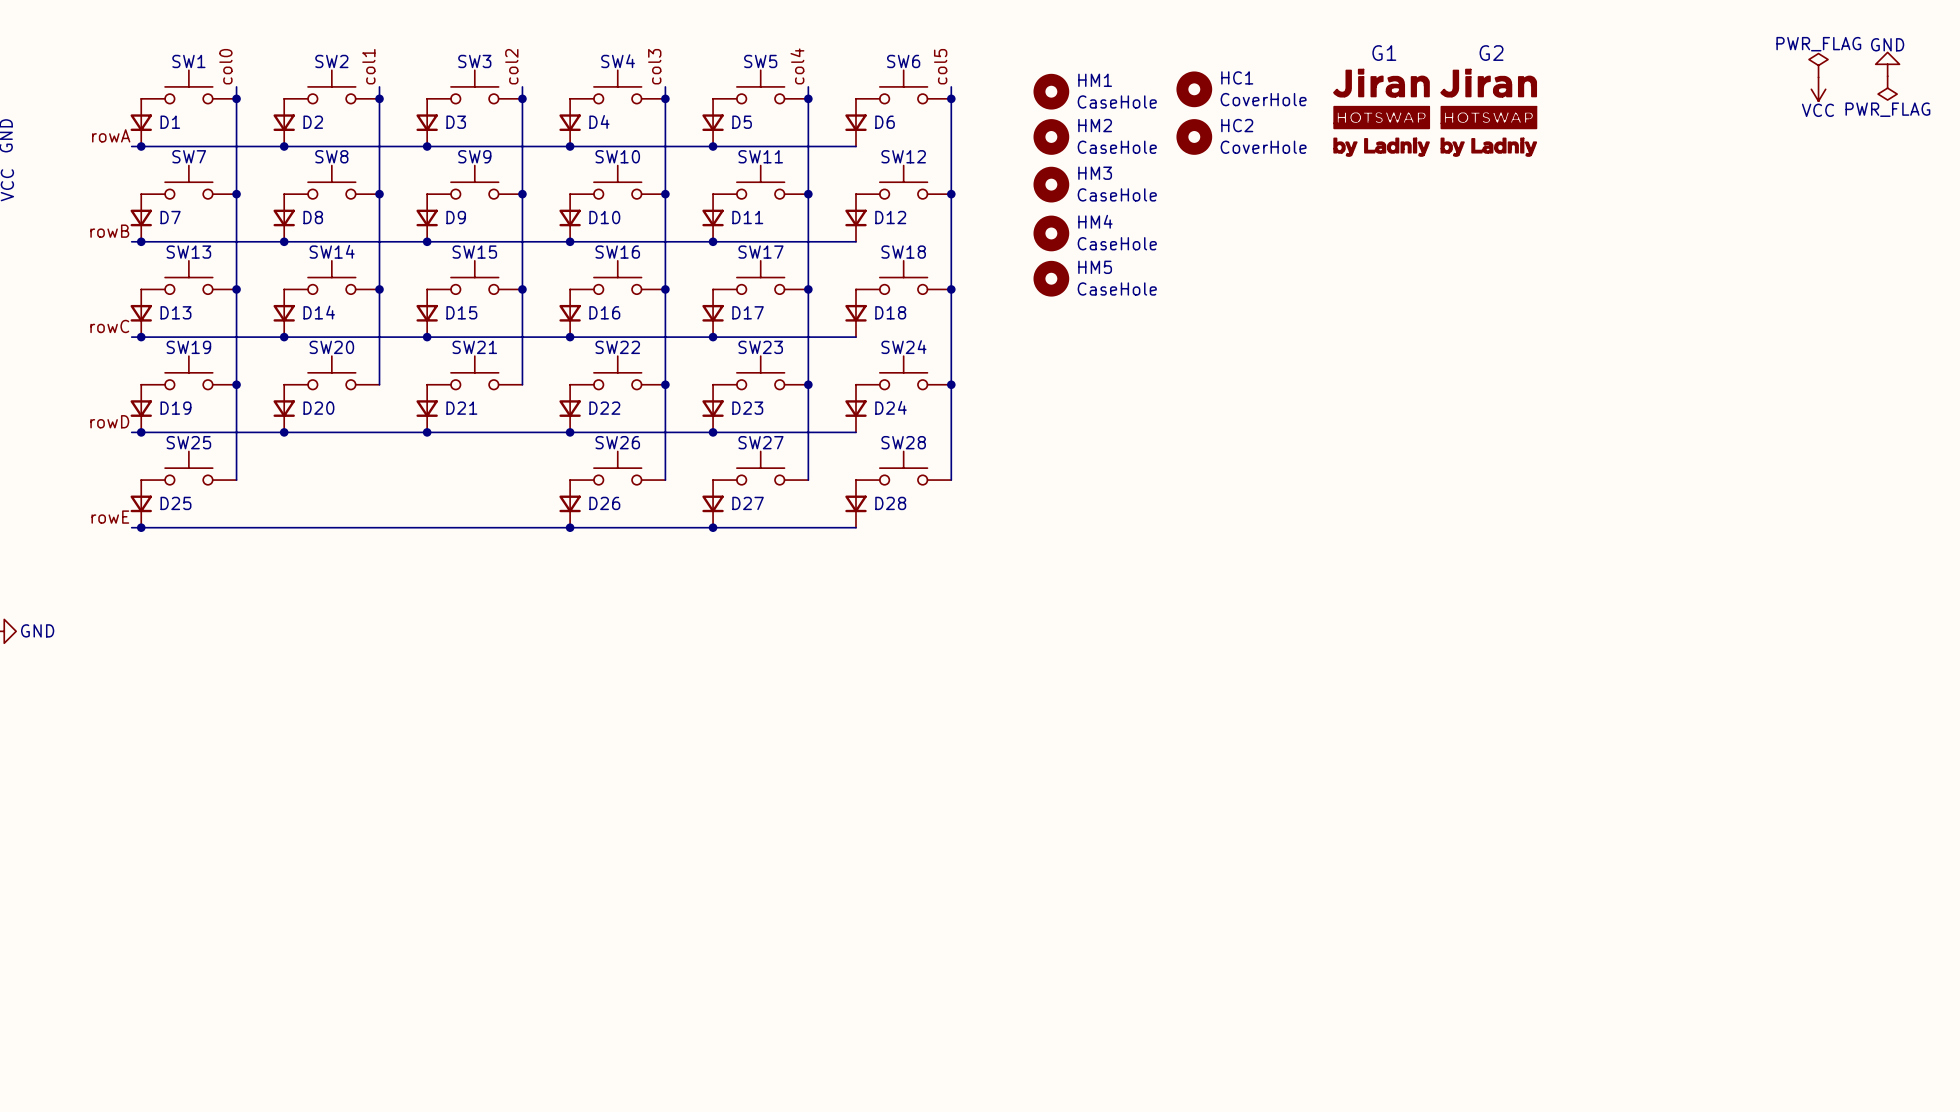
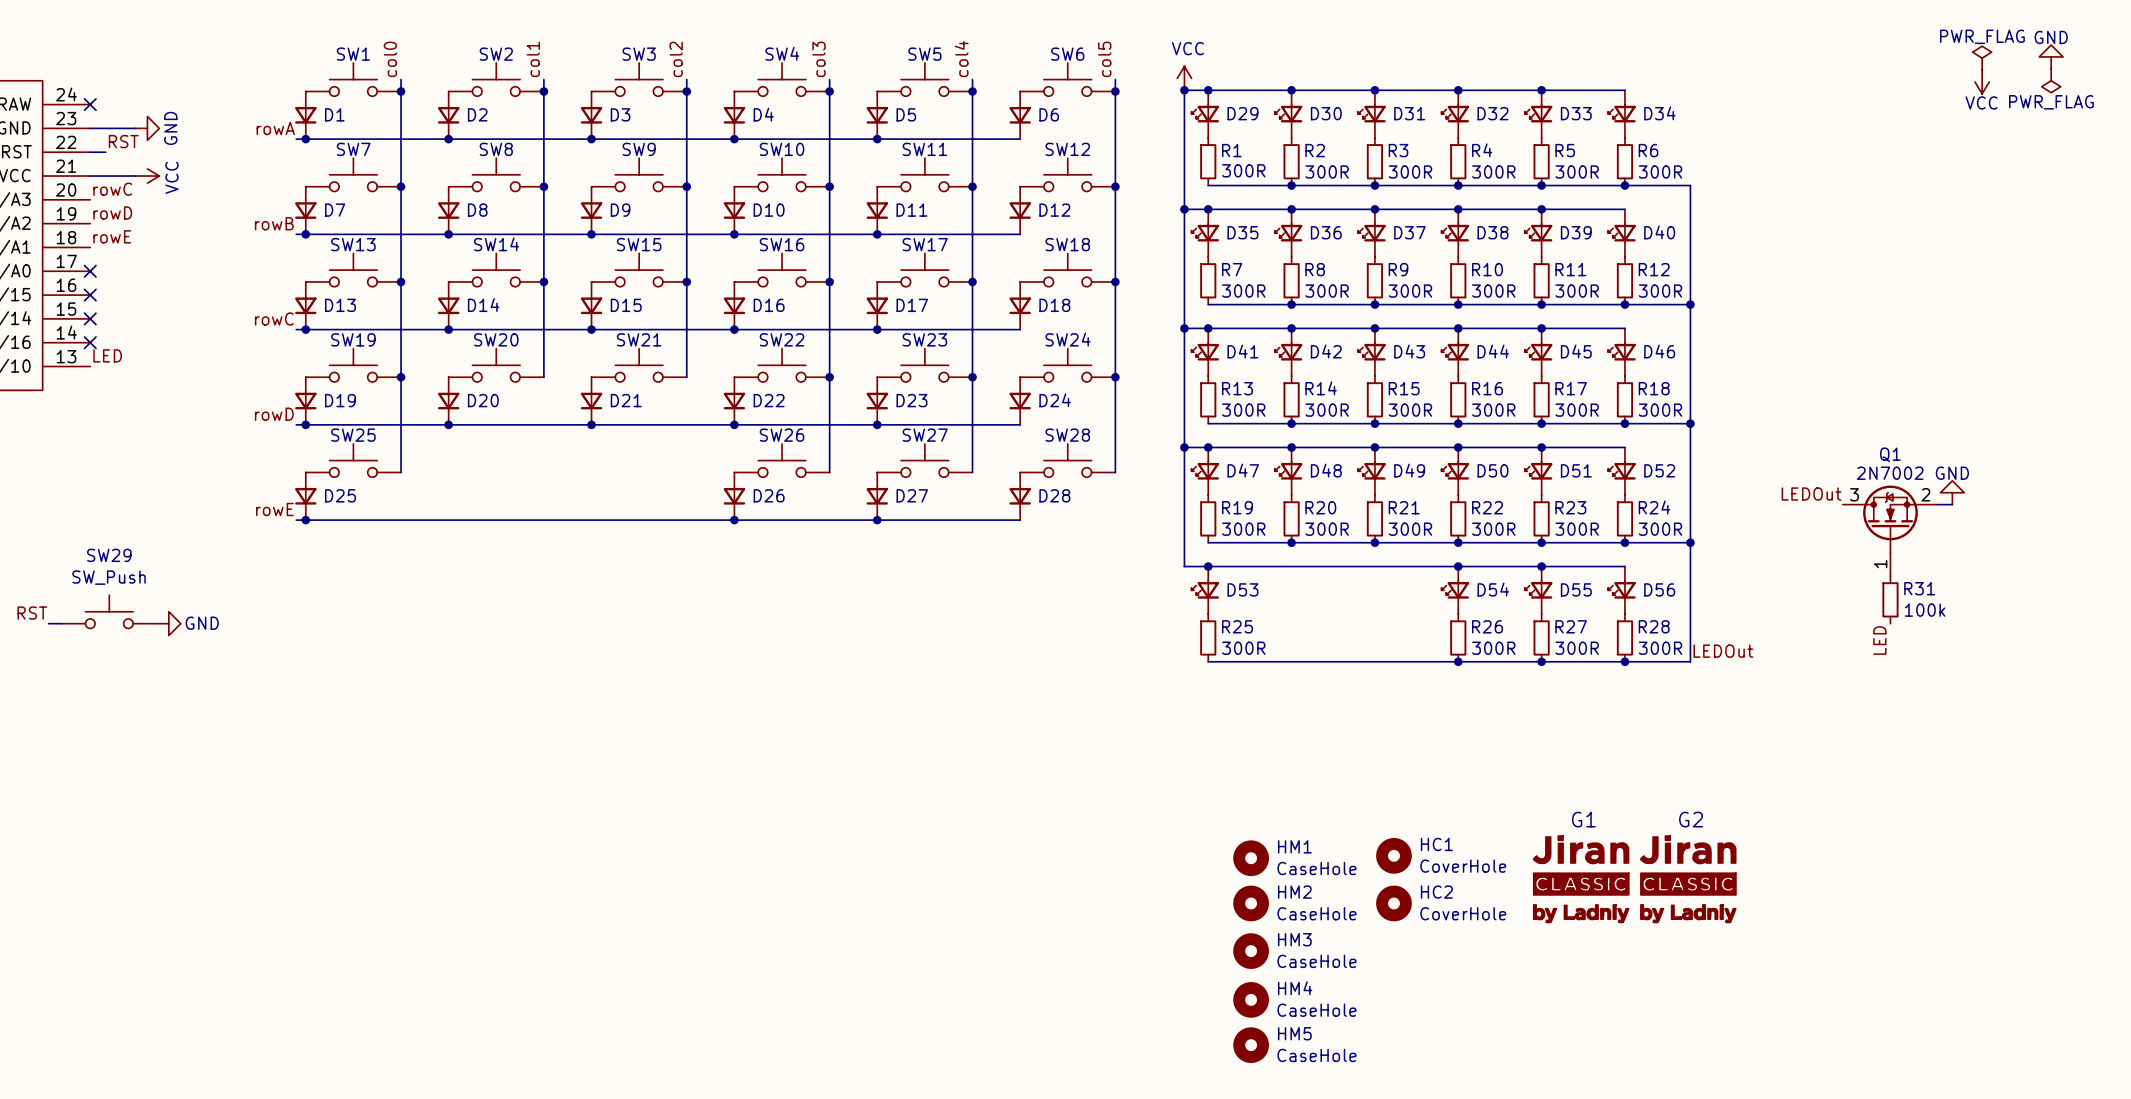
G1 symbol: [1333, 69, 1430, 157] -> [1533, 835, 1629, 923]
G2 symbol: [1441, 69, 1537, 157] -> [1640, 835, 1737, 923]
power symbol: none -> VCC (1184, 78)
HC1 position: (1194, 89) -> (1393, 855)
HM1 position: (1051, 91) -> (1251, 858)
junction: none -> (1184, 90)
junction: none -> (1208, 90)
junction: none -> (1291, 90)
junction: none -> (1374, 90)
junction: none -> (1458, 90)
junction: none -> (1541, 90)
wire: none -> (1624, 90) (1184, 90) (1184, 566) (1624, 566)
D29: none -> (1205, 114)
D30: none -> (1288, 114)
D31: none -> (1371, 114)
D32: none -> (1455, 114)
D33: none -> (1538, 114)
D34: none -> (1621, 114)
HM2 position: (1051, 136) -> (1251, 903)
HC2 position: (1194, 136) -> (1393, 903)
R1: none -> 300R (1208, 161)
R2: none -> 300R (1291, 161)
R3: none -> 300R (1374, 161)
R4: none -> 300R (1458, 161)
R5: none -> 300R (1541, 161)
R6: none -> 300R (1624, 161)
HM3 position: (1051, 184) -> (1251, 951)
wire: none -> (1208, 185) (1690, 185) (1690, 661) (1208, 661)
junction: none -> (1291, 185)
junction: none -> (1374, 185)
junction: none -> (1458, 185)
junction: none -> (1541, 185)
junction: none -> (1624, 185)
wire: none -> (1184, 209) (1624, 209)
junction: none -> (1184, 209)
junction: none -> (1208, 209)
junction: none -> (1291, 209)
junction: none -> (1374, 209)
junction: none -> (1458, 209)
junction: none -> (1541, 209)
HM4 position: (1051, 233) -> (1251, 999)
D35: none -> (1205, 233)
D36: none -> (1288, 233)
D37: none -> (1371, 233)
D38: none -> (1455, 233)
D39: none -> (1538, 233)
D40: none -> (1621, 233)
HM5 position: (1051, 278) -> (1251, 1045)
R7: none -> 300R (1208, 280)
R8: none -> 300R (1291, 280)
R9: none -> 300R (1374, 280)
R10: none -> 300R (1458, 280)
R11: none -> 300R (1541, 280)
R12: none -> 300R (1624, 280)
wire: none -> (1208, 304) (1690, 304)
junction: none -> (1291, 304)
junction: none -> (1374, 304)
junction: none -> (1458, 304)
junction: none -> (1541, 304)
junction: none -> (1624, 304)
junction: none -> (1690, 304)
wire: none -> (1184, 328) (1624, 328)
junction: none -> (1184, 328)
junction: none -> (1208, 328)
junction: none -> (1291, 328)
junction: none -> (1374, 328)
junction: none -> (1458, 328)
junction: none -> (1541, 328)
D41: none -> (1205, 352)
D42: none -> (1288, 352)
D43: none -> (1371, 352)
D44: none -> (1455, 352)
D45: none -> (1538, 352)
D46: none -> (1621, 352)
R13: none -> 300R (1208, 399)
R14: none -> 300R (1291, 399)
R15: none -> 300R (1374, 399)
R16: none -> 300R (1458, 399)
R17: none -> 300R (1541, 399)
R18: none -> 300R (1624, 399)
wire: none -> (1208, 423) (1690, 423)
junction: none -> (1291, 423)
junction: none -> (1374, 423)
junction: none -> (1458, 423)
junction: none -> (1541, 423)
junction: none -> (1624, 423)
junction: none -> (1690, 423)
wire: none -> (1184, 447) (1624, 447)
junction: none -> (1184, 447)
junction: none -> (1208, 447)
junction: none -> (1291, 447)
junction: none -> (1374, 447)
junction: none -> (1458, 447)
junction: none -> (1541, 447)
D47: none -> (1205, 471)
D48: none -> (1288, 471)
D49: none -> (1371, 471)
D50: none -> (1455, 471)
D51: none -> (1538, 471)
D52: none -> (1621, 471)
power symbol: none -> GND (1952, 492)
label: none -> LEDOut (1811, 494)
wire: none -> (1938, 504) (1952, 504)
R19: none -> 300R (1208, 518)
R20: none -> 300R (1291, 518)
R21: none -> 300R (1374, 518)
R22: none -> 300R (1458, 518)
R23: none -> 300R (1541, 518)
R24: none -> 300R (1624, 518)
Q1: none -> 2N7002 (1890, 530)
wire: none -> (1208, 542) (1690, 542)
junction: none -> (1291, 542)
junction: none -> (1374, 542)
junction: none -> (1458, 542)
junction: none -> (1541, 542)
junction: none -> (1624, 542)
junction: none -> (1690, 542)
junction: none -> (1208, 566)
junction: none -> (1458, 566)
junction: none -> (1541, 566)
D53: none -> (1205, 590)
D54: none -> (1455, 590)
D55: none -> (1538, 590)
D56: none -> (1621, 590)
R31: none -> 100k (1890, 599)
R25: none -> 300R (1208, 637)
R26: none -> 300R (1458, 637)
R27: none -> 300R (1541, 637)
R28: none -> 300R (1624, 637)
label: none -> LED (1879, 640)
label: none -> LEDOut (1723, 651)
junction: none -> (1458, 661)
junction: none -> (1541, 661)
junction: none -> (1624, 661)

